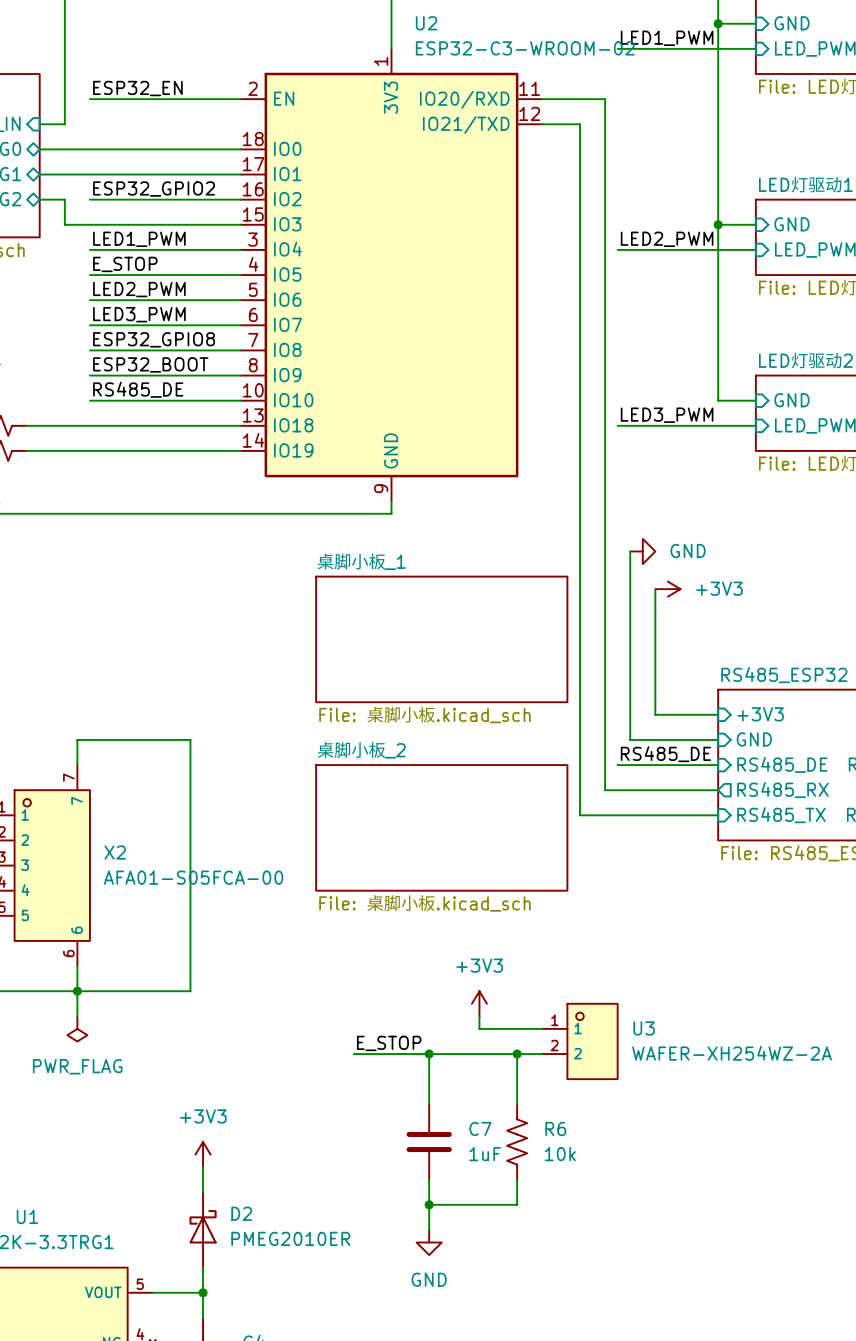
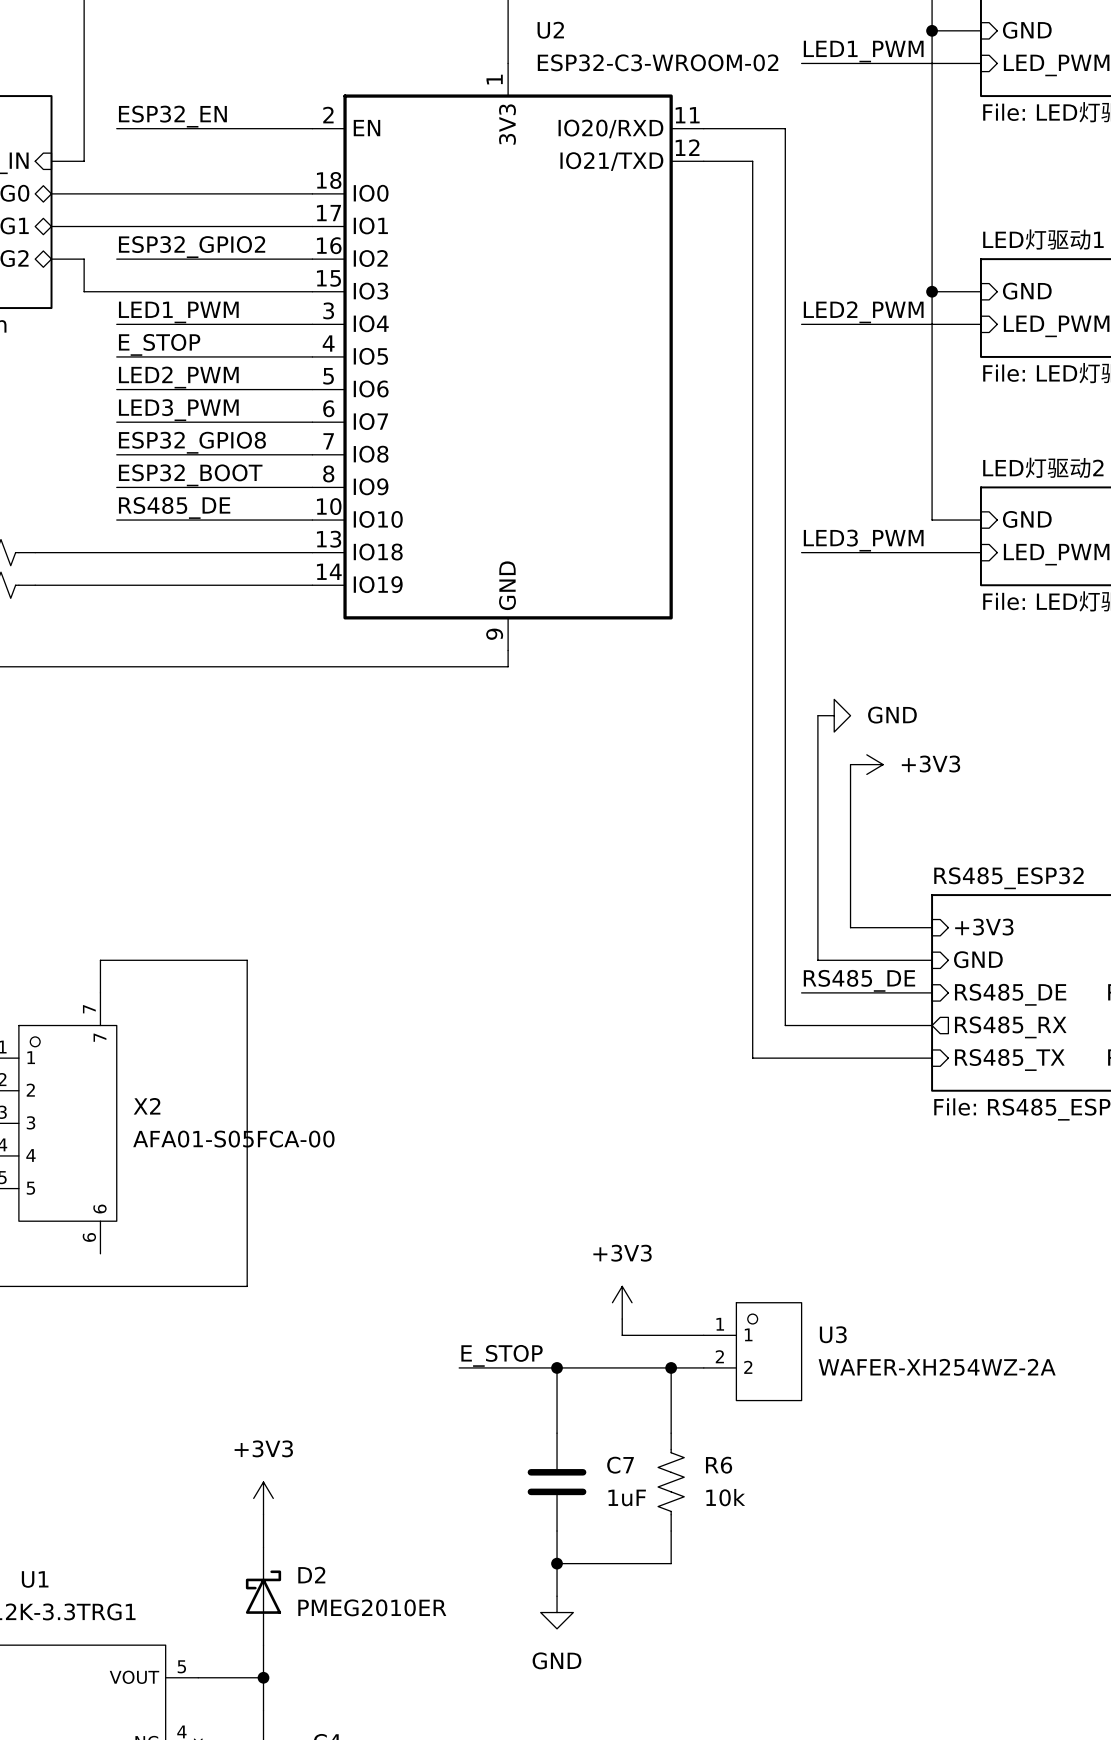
sheet 桌脚小板_1: File: 桌脚小板.kicad_sch (441, 639) -> none
sheet 桌脚小板_2: File: 桌脚小板.kicad_sch (441, 827) -> none
wire: (77, 966) (77, 1016) -> none
junction: (77, 991) -> none
power symbol: PWR_FLAG (77, 1028) -> none

